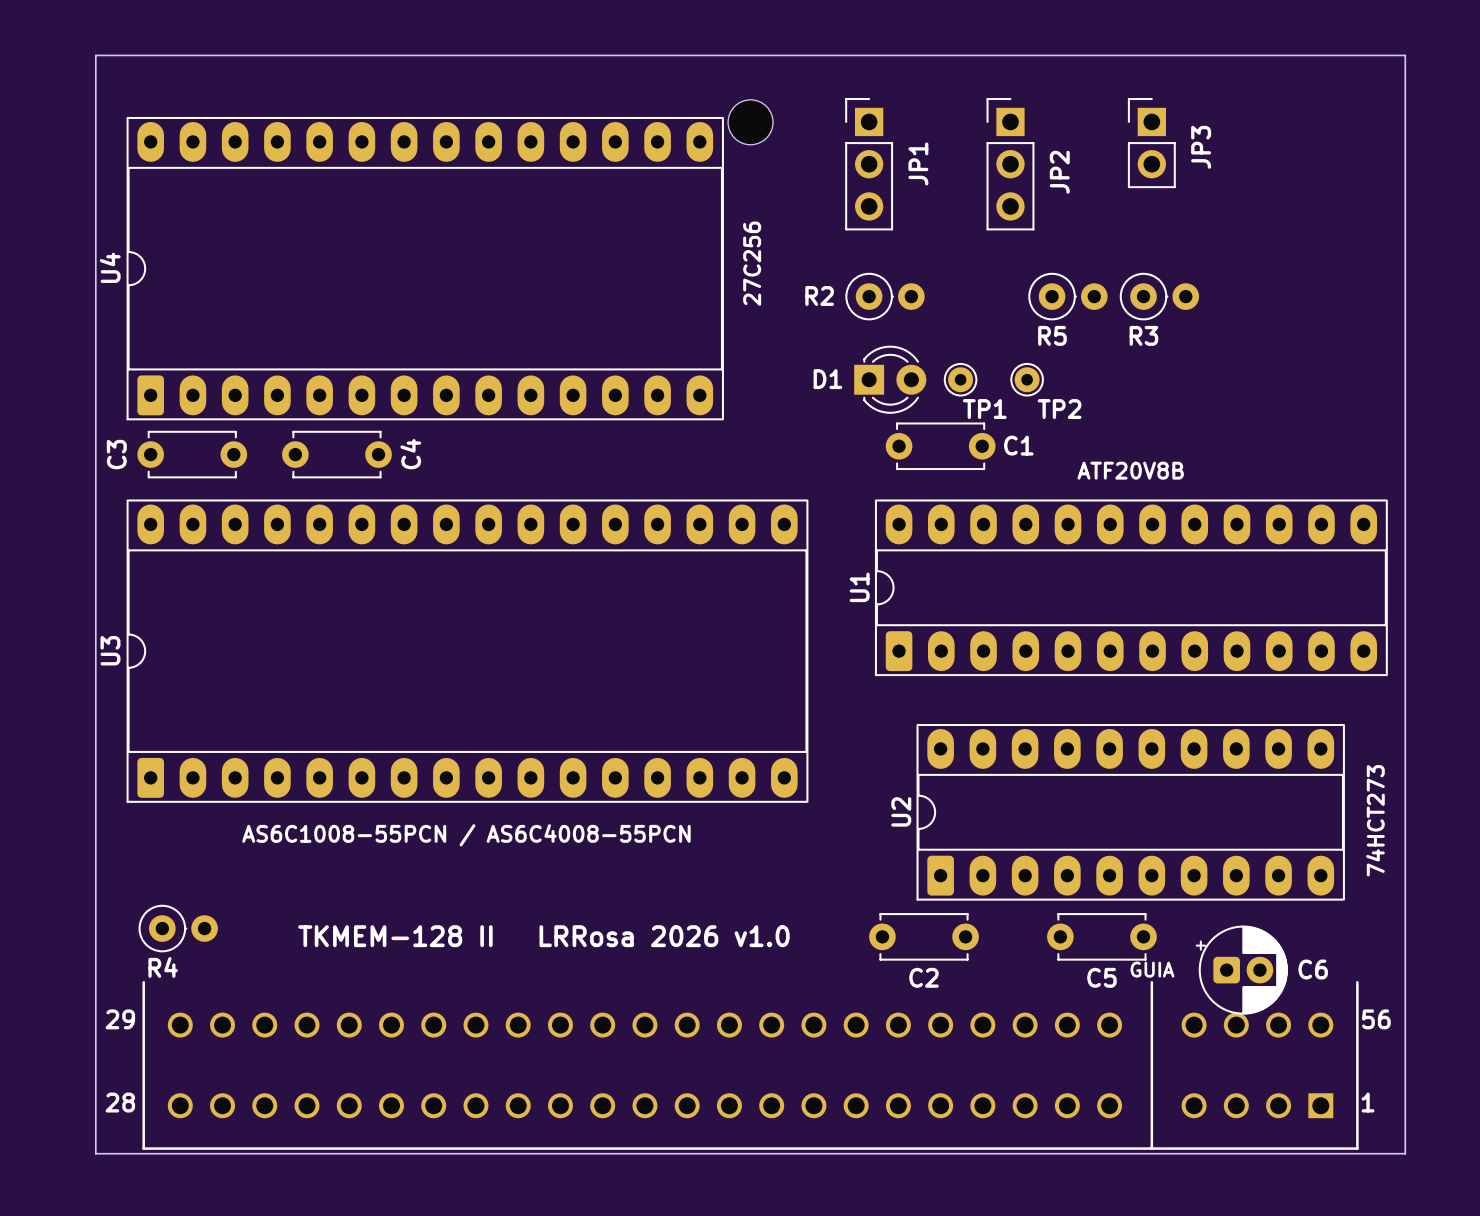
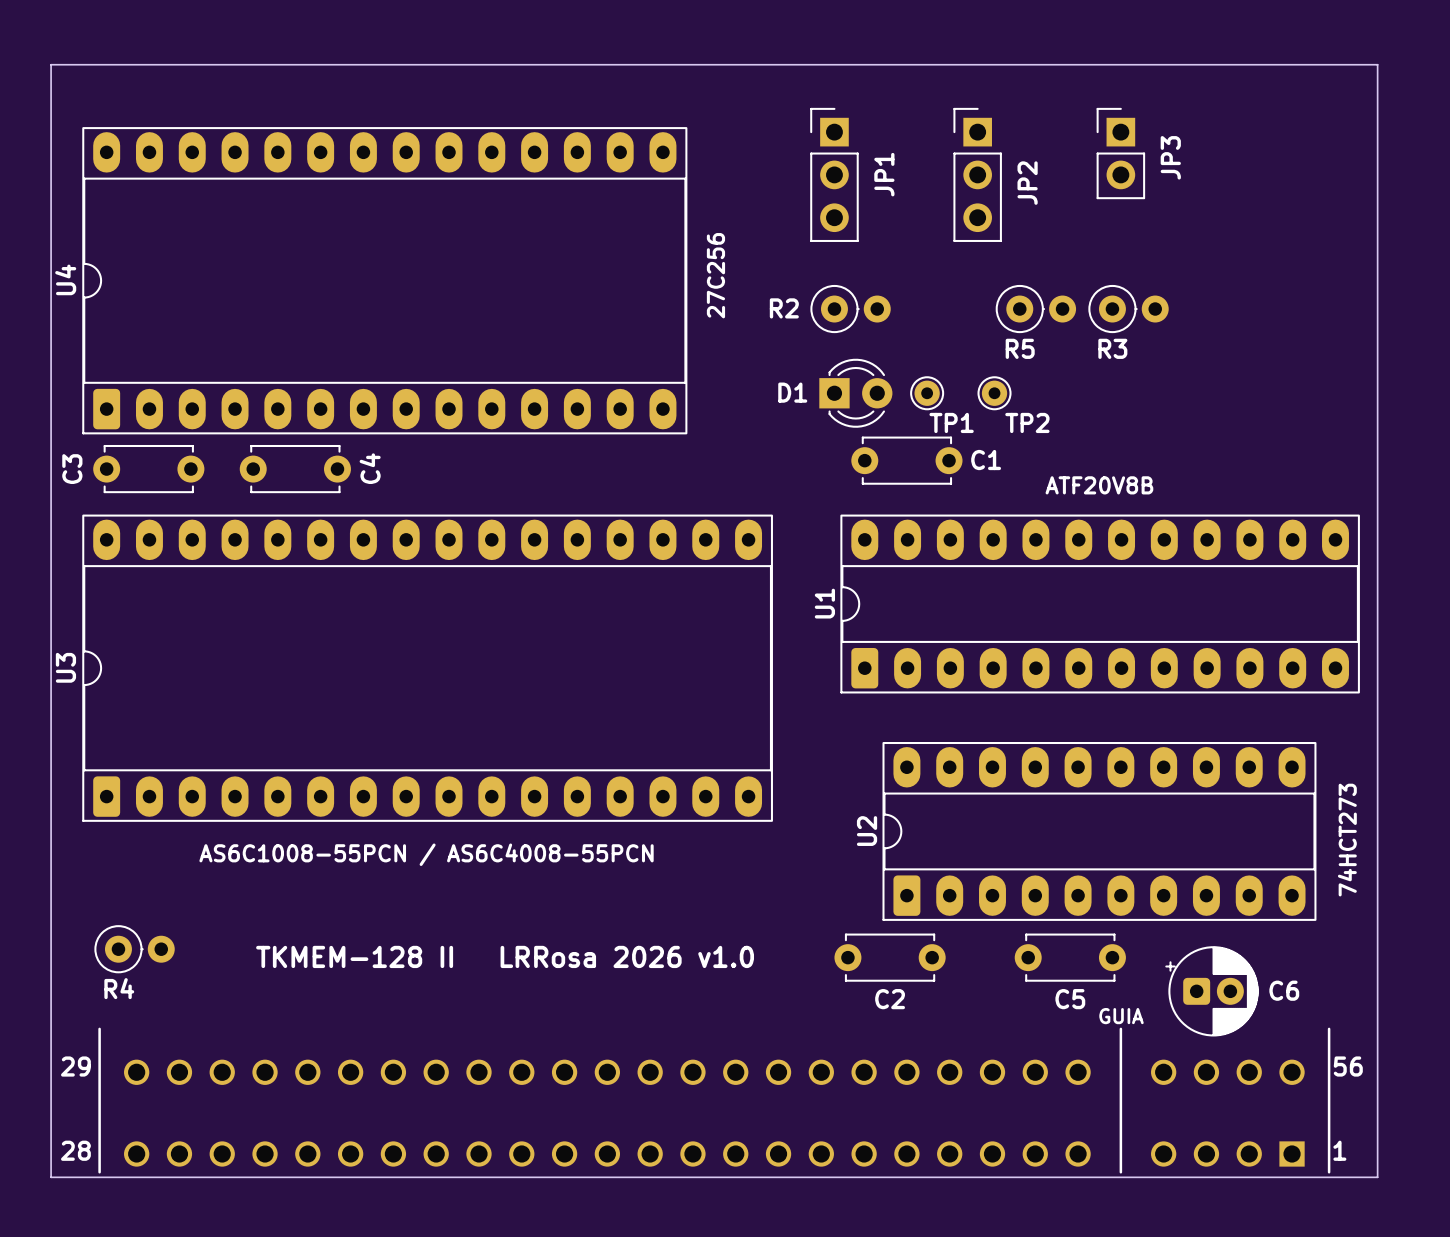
part: (750, 122) -> none
part footprint: [142, 981, 1359, 1150] -> [98, 1027, 1331, 1174]

